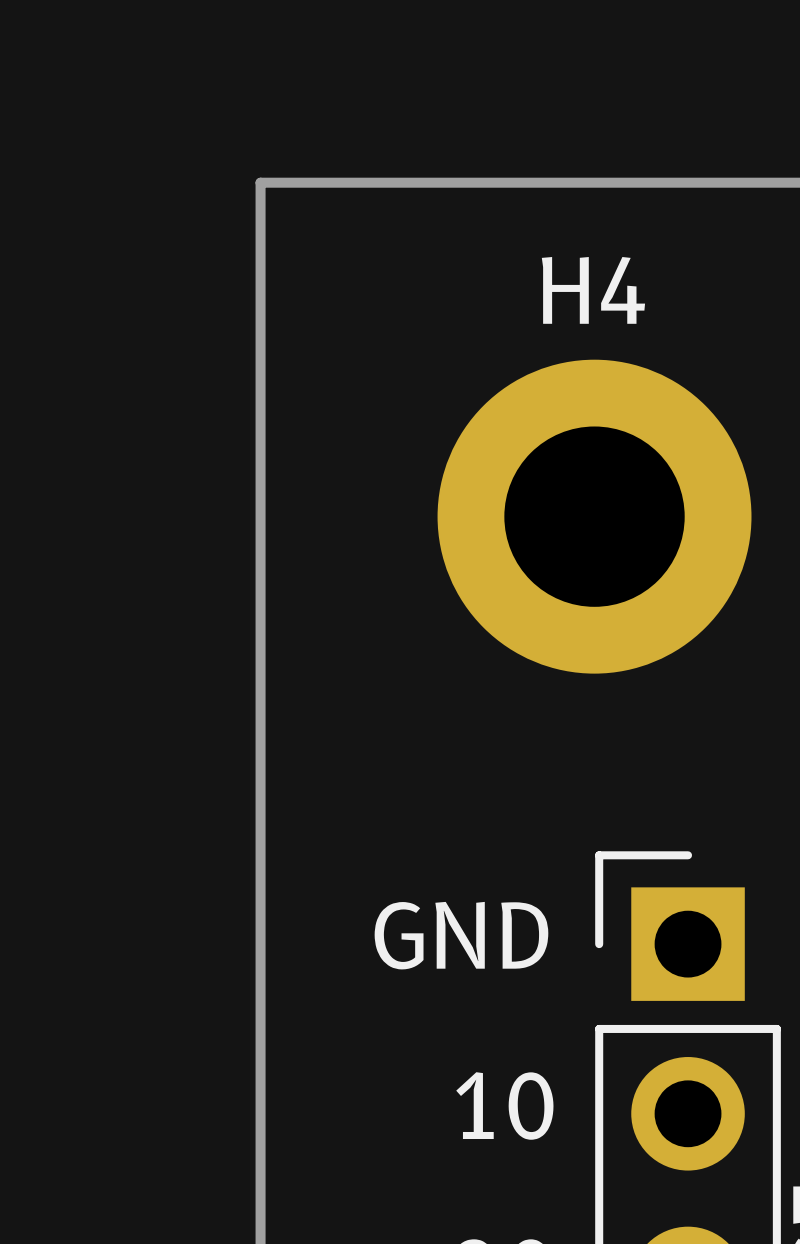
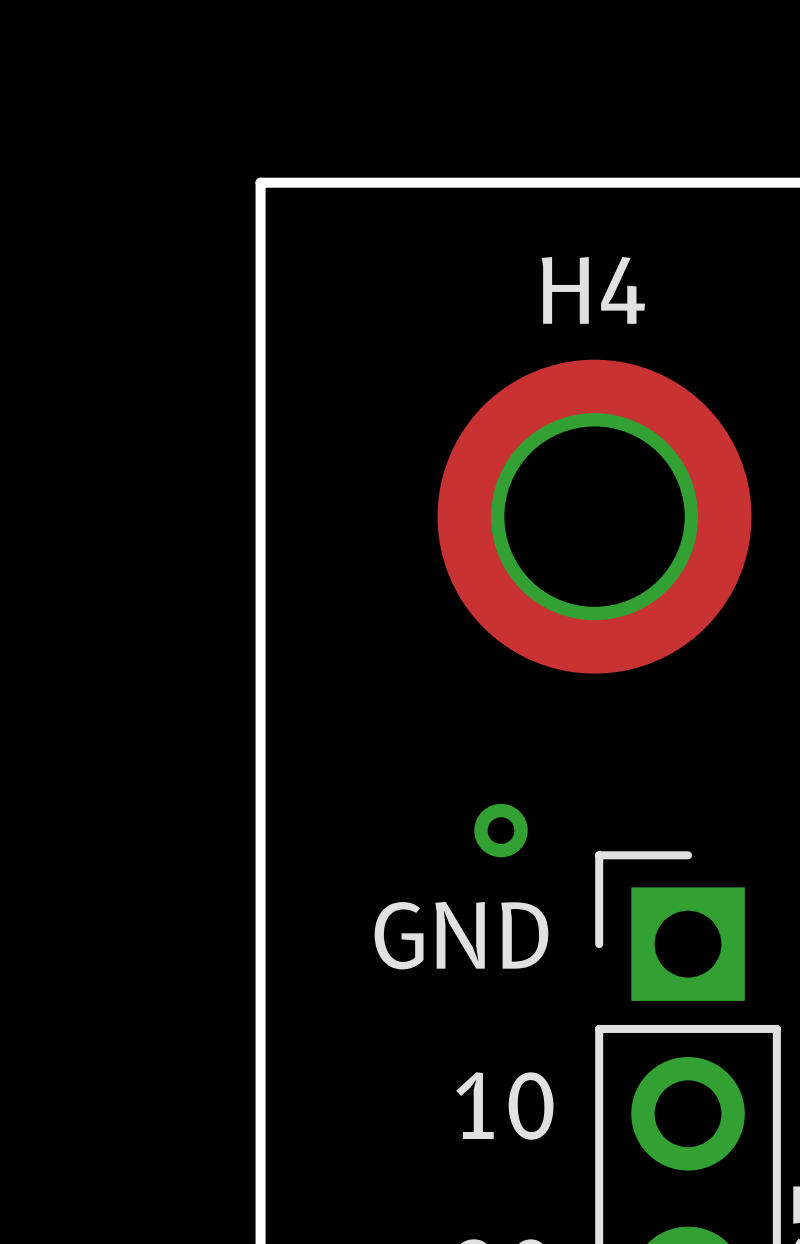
via: none -> (501, 830)

